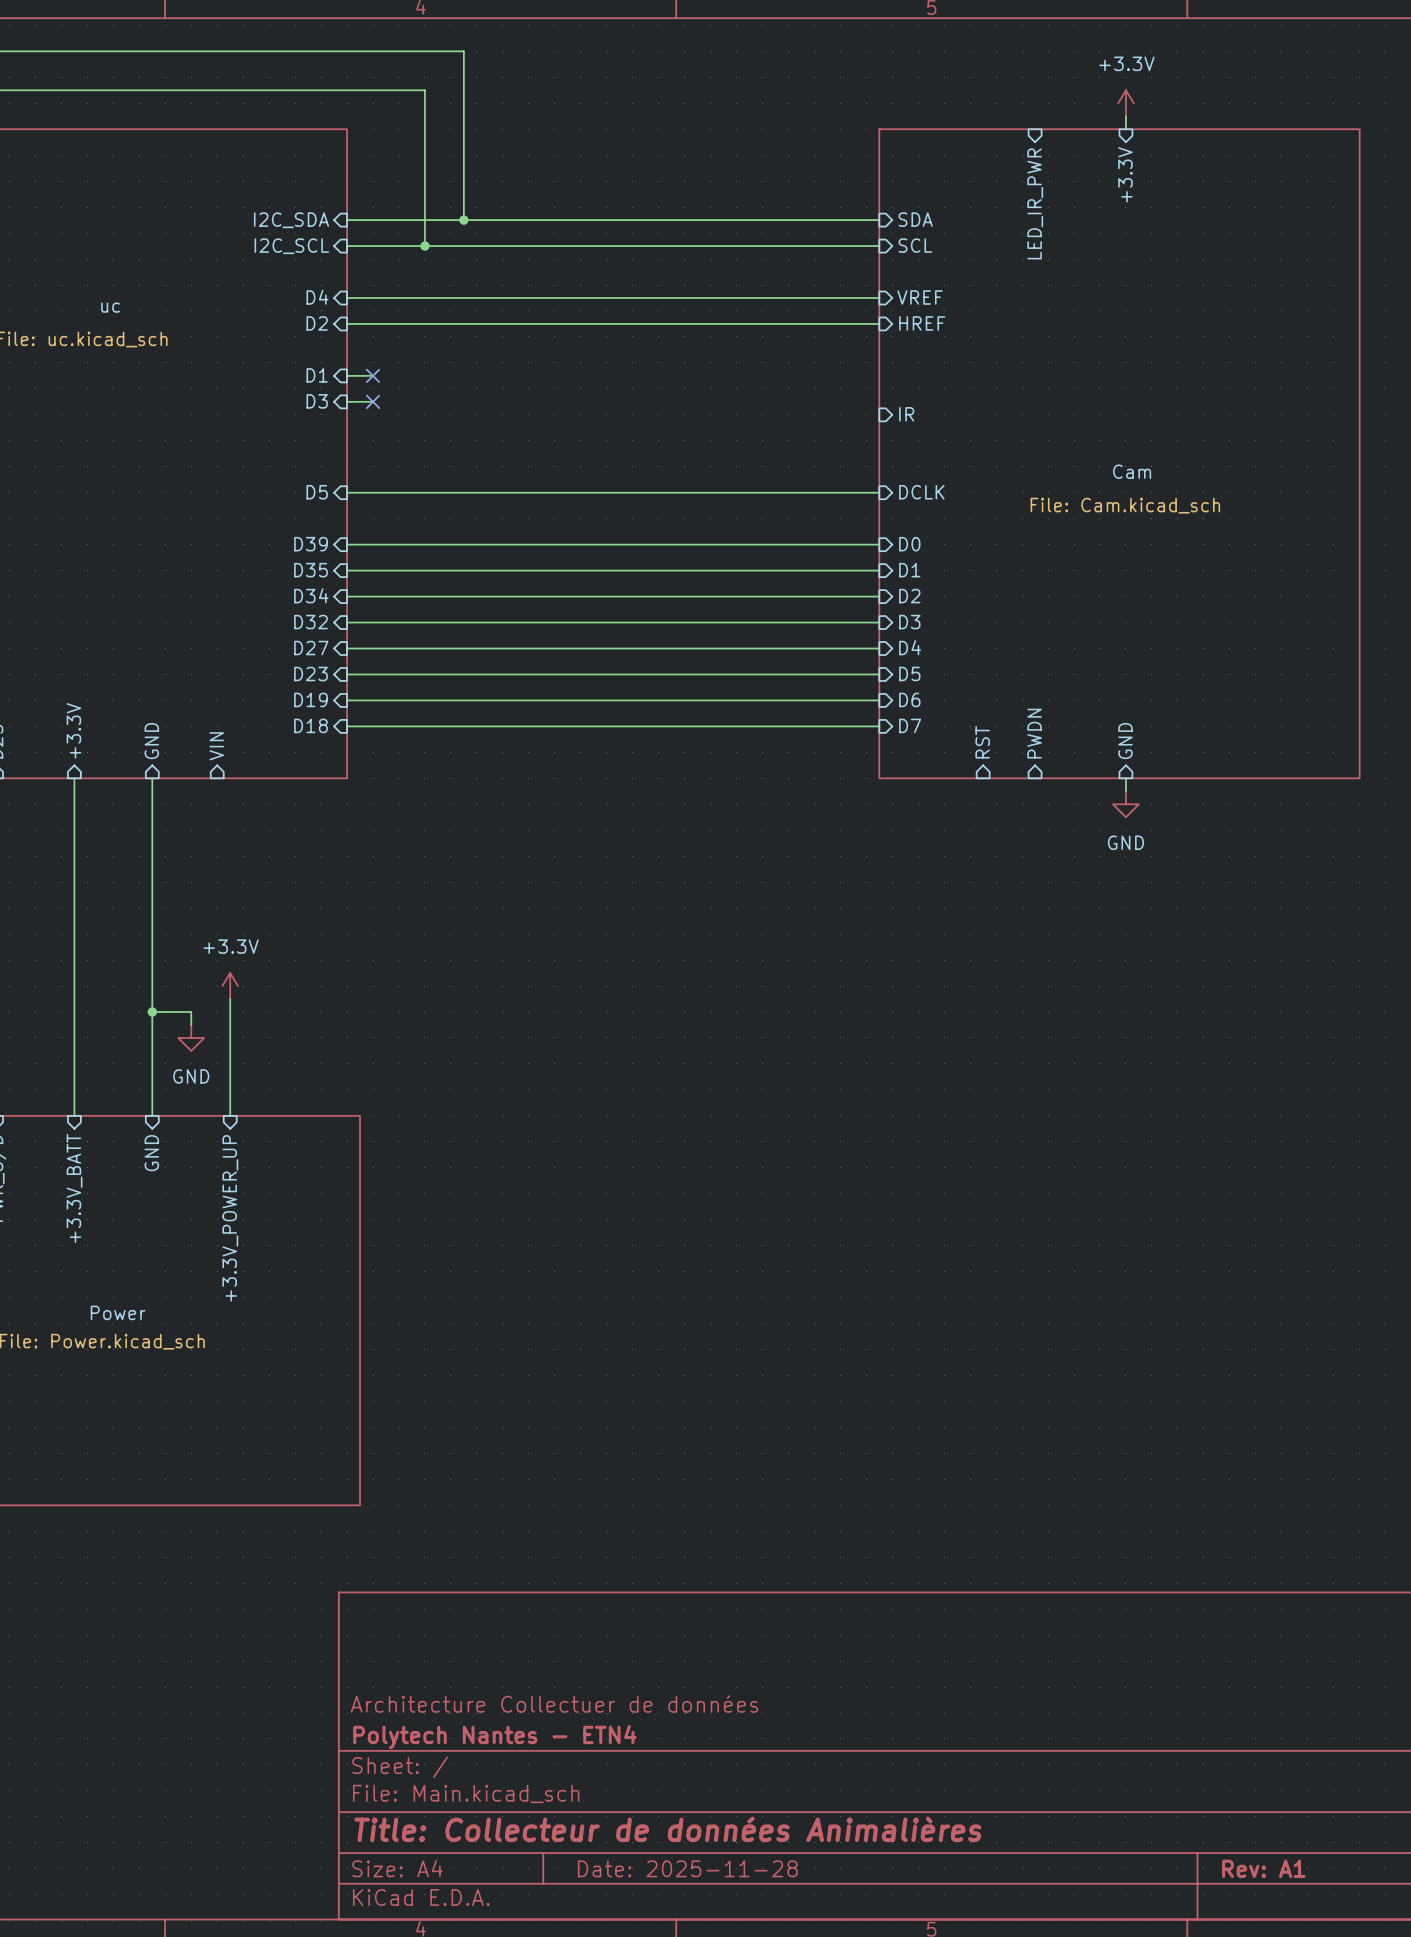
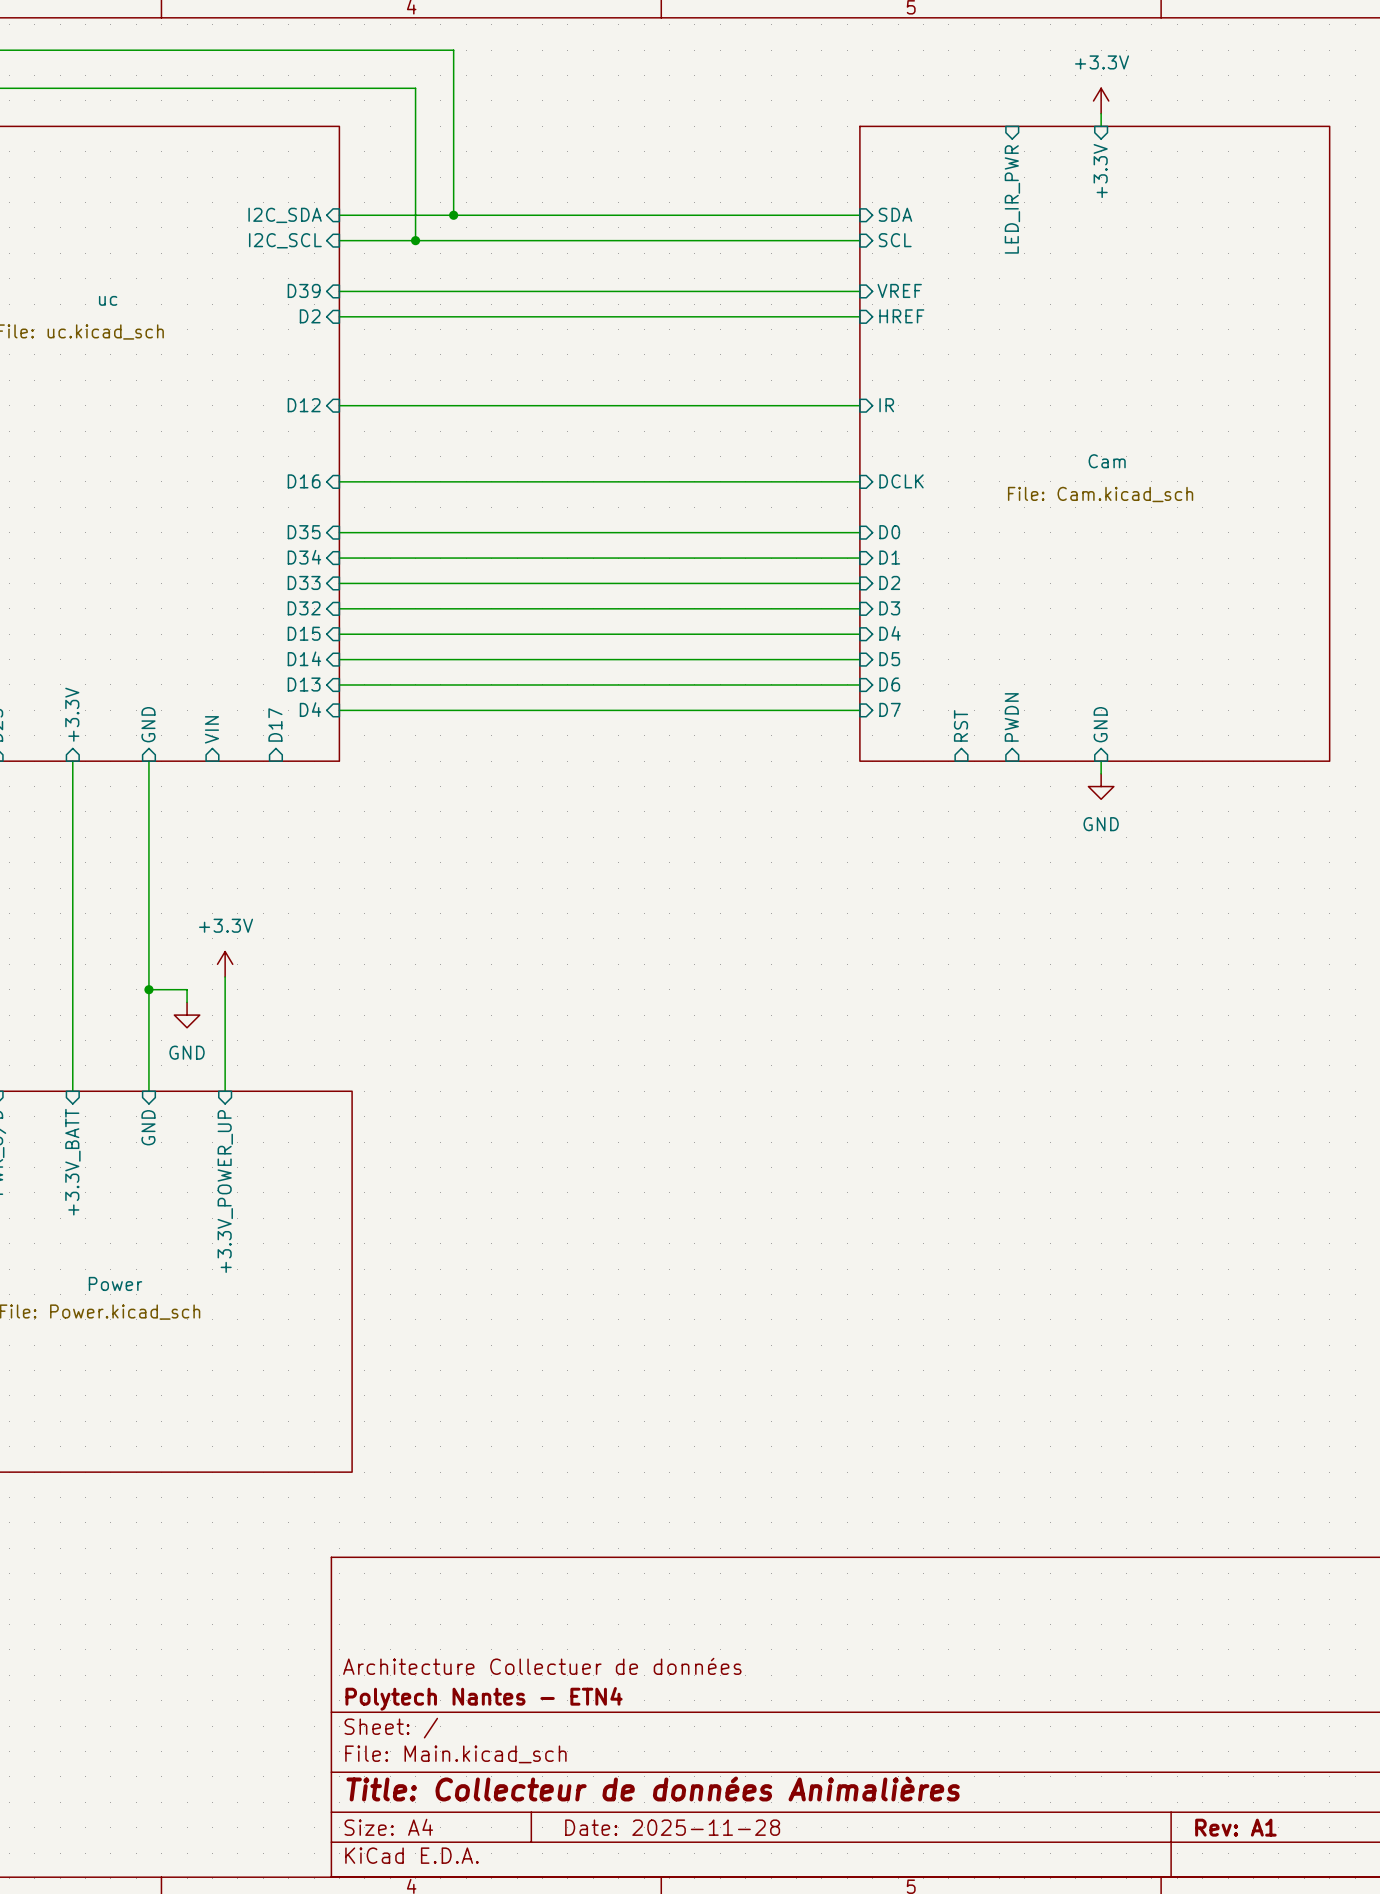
sheet pin: D4 (317, 297) -> D39 (304, 290)
sheet pin: D1 (317, 375) -> none
wire: (347, 375) (373, 375) -> none
no-connect mark: (373, 375) -> none
sheet pin: D3 (317, 401) -> none
wire: (347, 401) (373, 401) -> none
no-connect mark: (373, 401) -> none
sheet pin: none -> D12 (304, 405)
wire: none -> (339, 405) (859, 405)
sheet pin: D5 (317, 492) -> D16 (304, 481)
sheet pin: D39 (310, 544) -> D35 (304, 532)
sheet pin: D35 (310, 570) -> D34 (304, 557)
sheet pin: D34 (311, 595) -> D33 (304, 582)
sheet pin: D27 (311, 648) -> D15 (304, 633)
sheet pin: D23 (310, 673) -> D14 (304, 658)
sheet pin: D19 (310, 699) -> D13 (304, 684)
sheet pin: D18 (310, 725) -> D4 (310, 709)
sheet pin: none -> D17 (275, 725)

